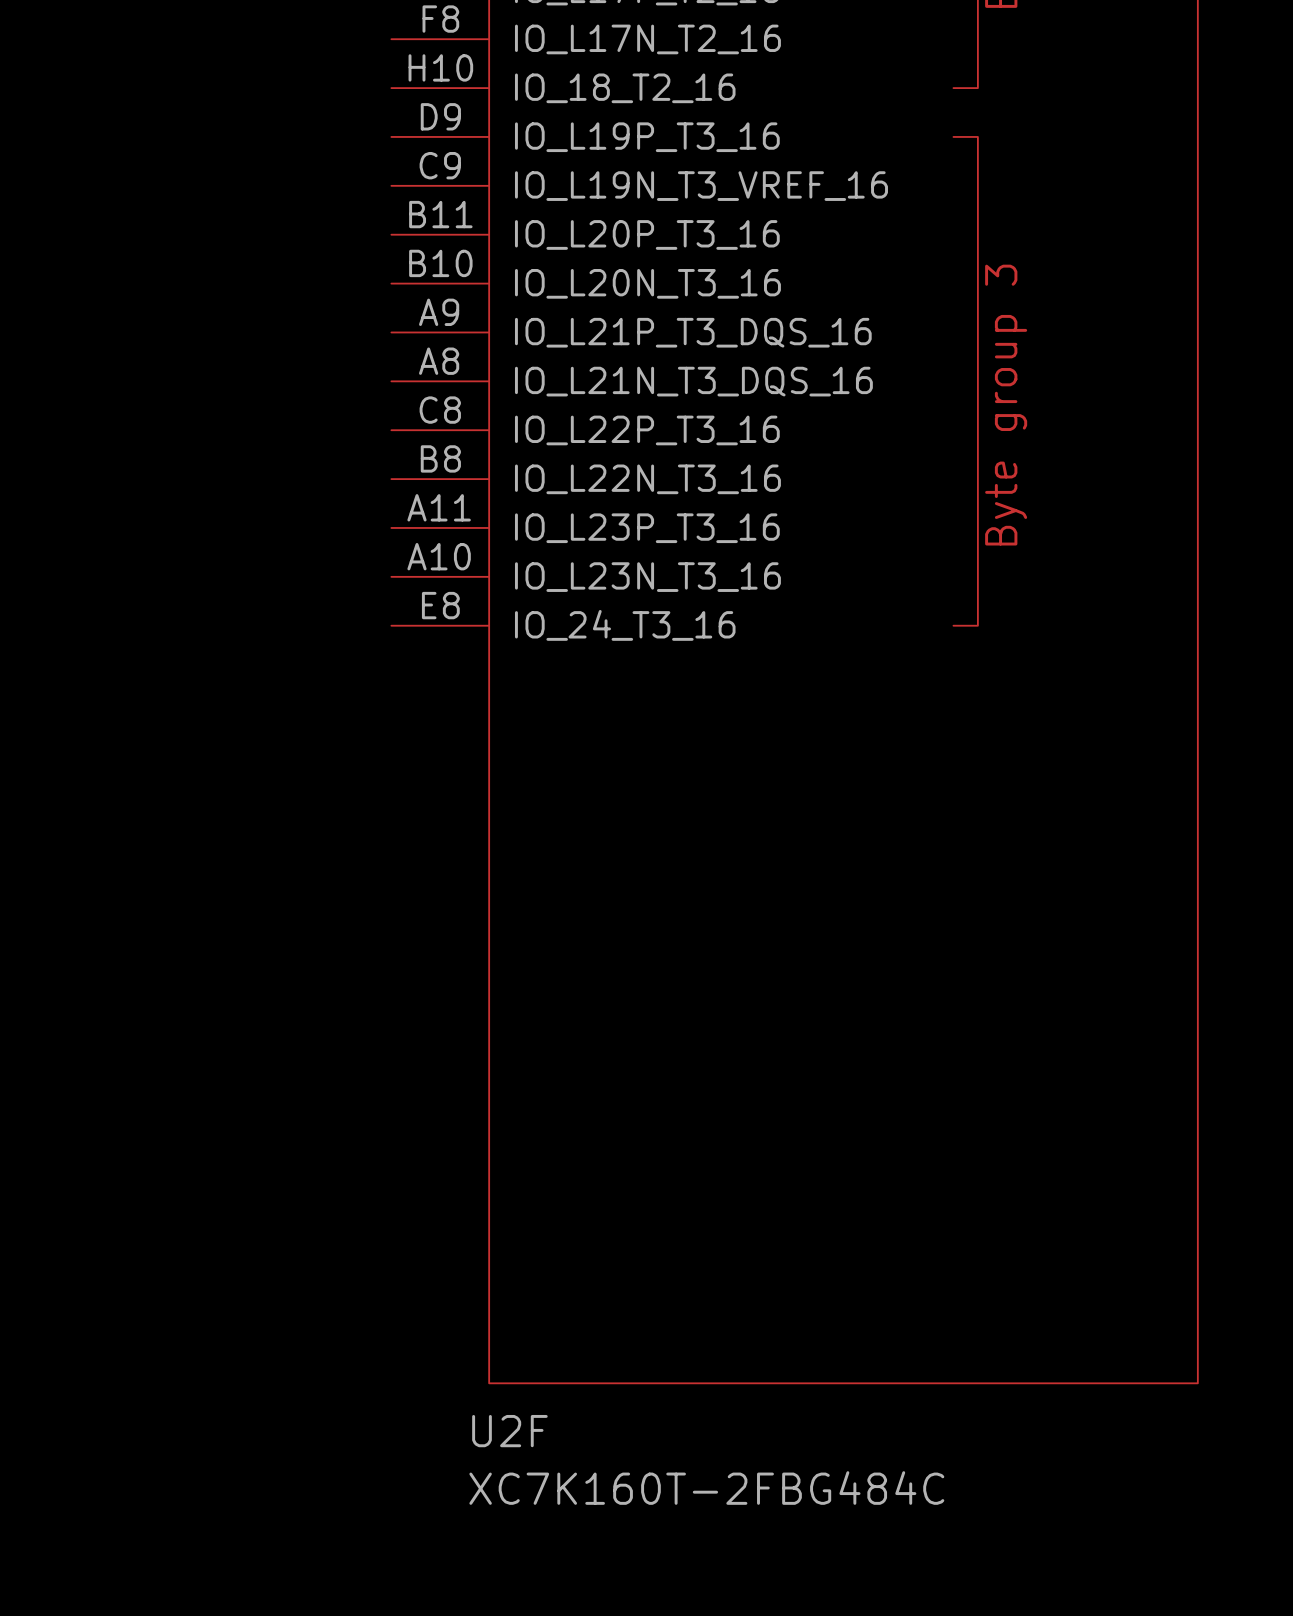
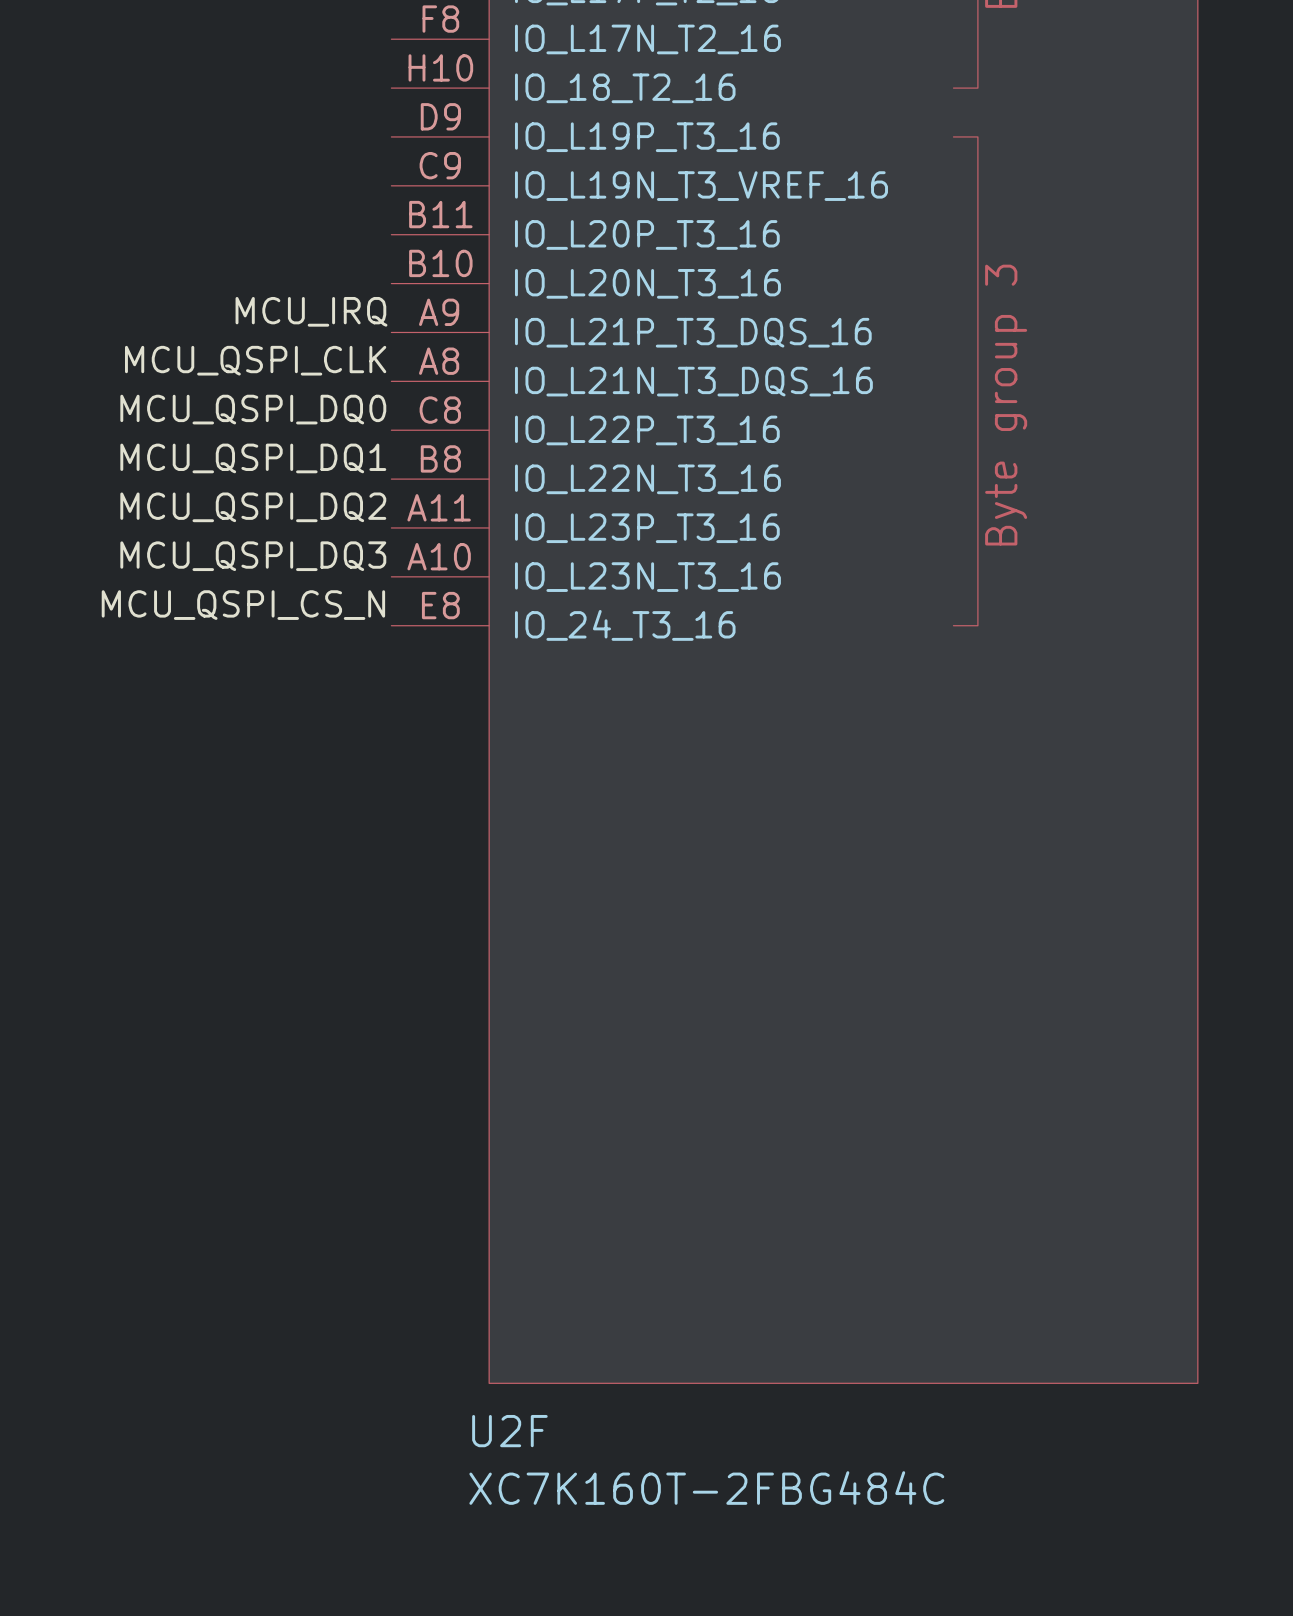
label: none -> MCU_IRQ (311, 311)
label: none -> MCU_QSPI_CLK (255, 360)
label: none -> MCU_QSPI_DQ0 (253, 409)
label: none -> MCU_QSPI_DQ1 (253, 458)
label: none -> MCU_QSPI_DQ2 (253, 507)
label: none -> MCU_QSPI_DQ3 (253, 556)
label: none -> MCU_QSPI_CS_N (243, 605)

